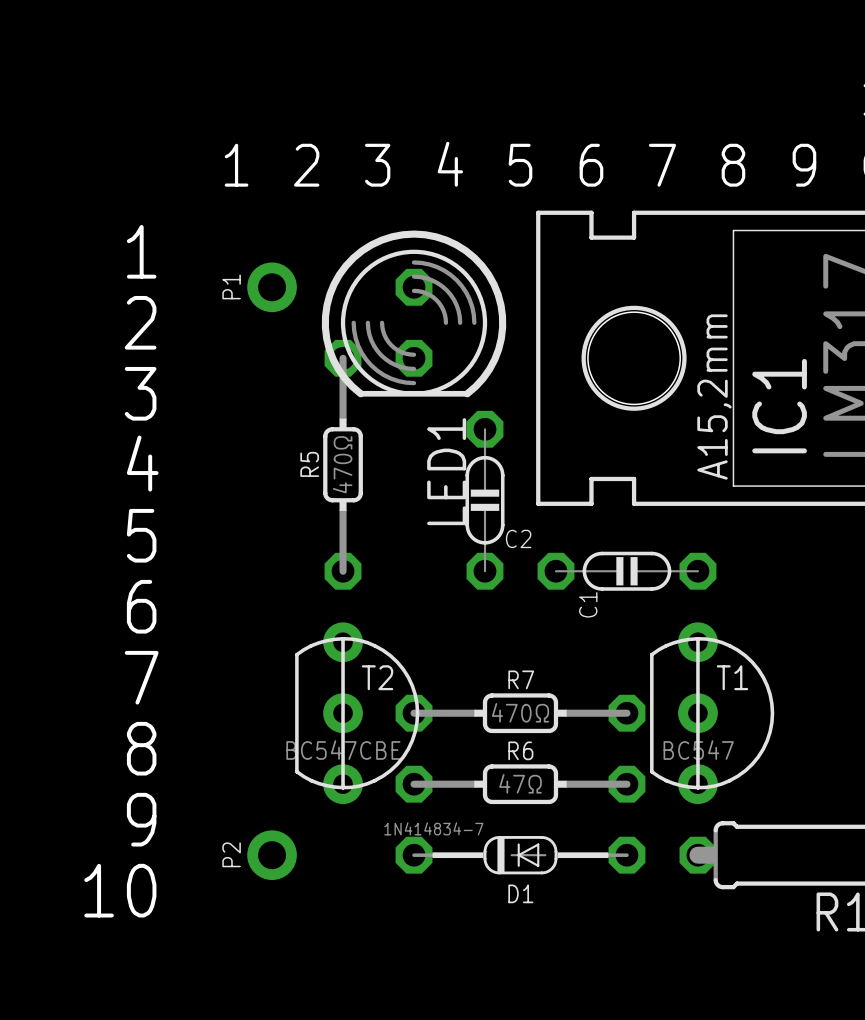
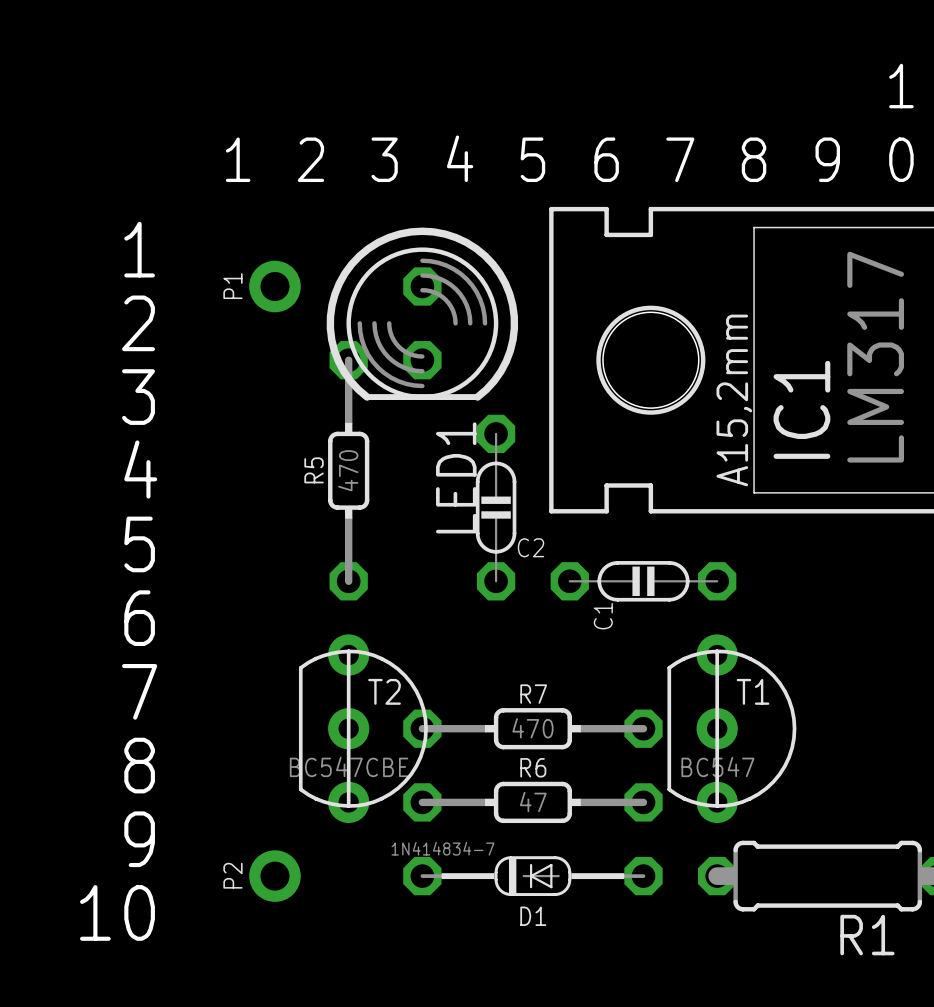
R5 value: 470Ω (342, 464) -> 470 (348, 470)
R7 value: 470Ω (520, 712) -> 470 (532, 728)
R6 value: 47Ω (520, 783) -> 47 (533, 801)

